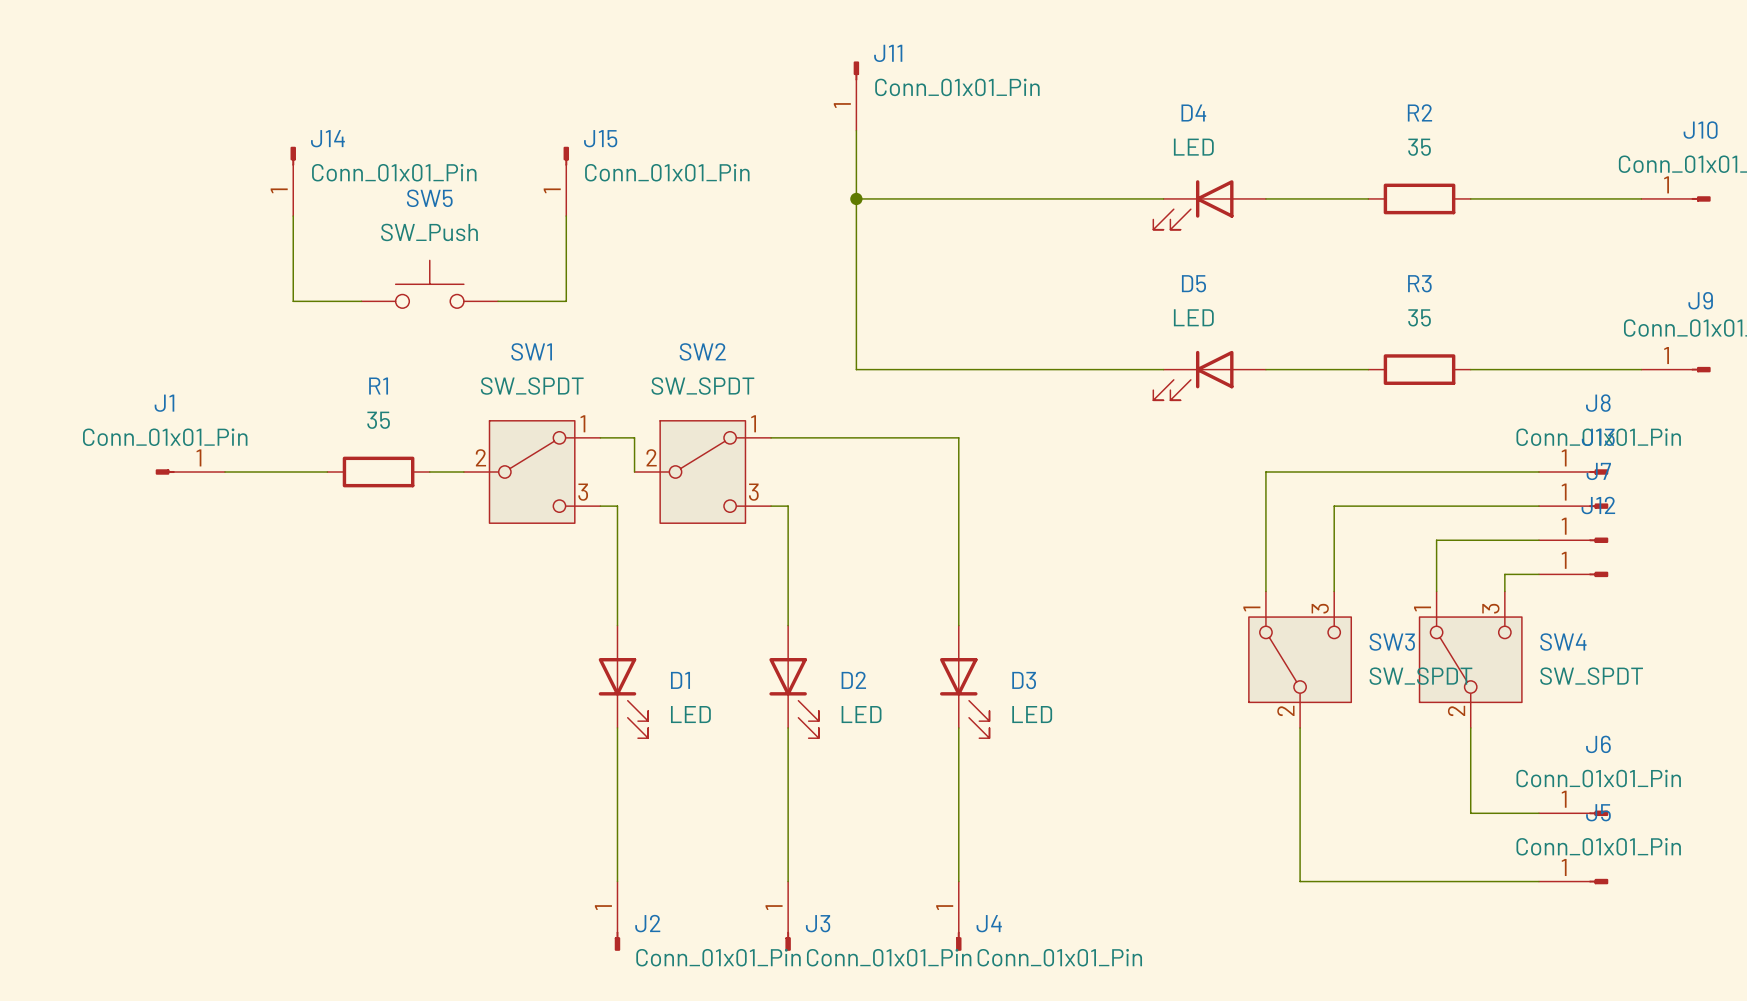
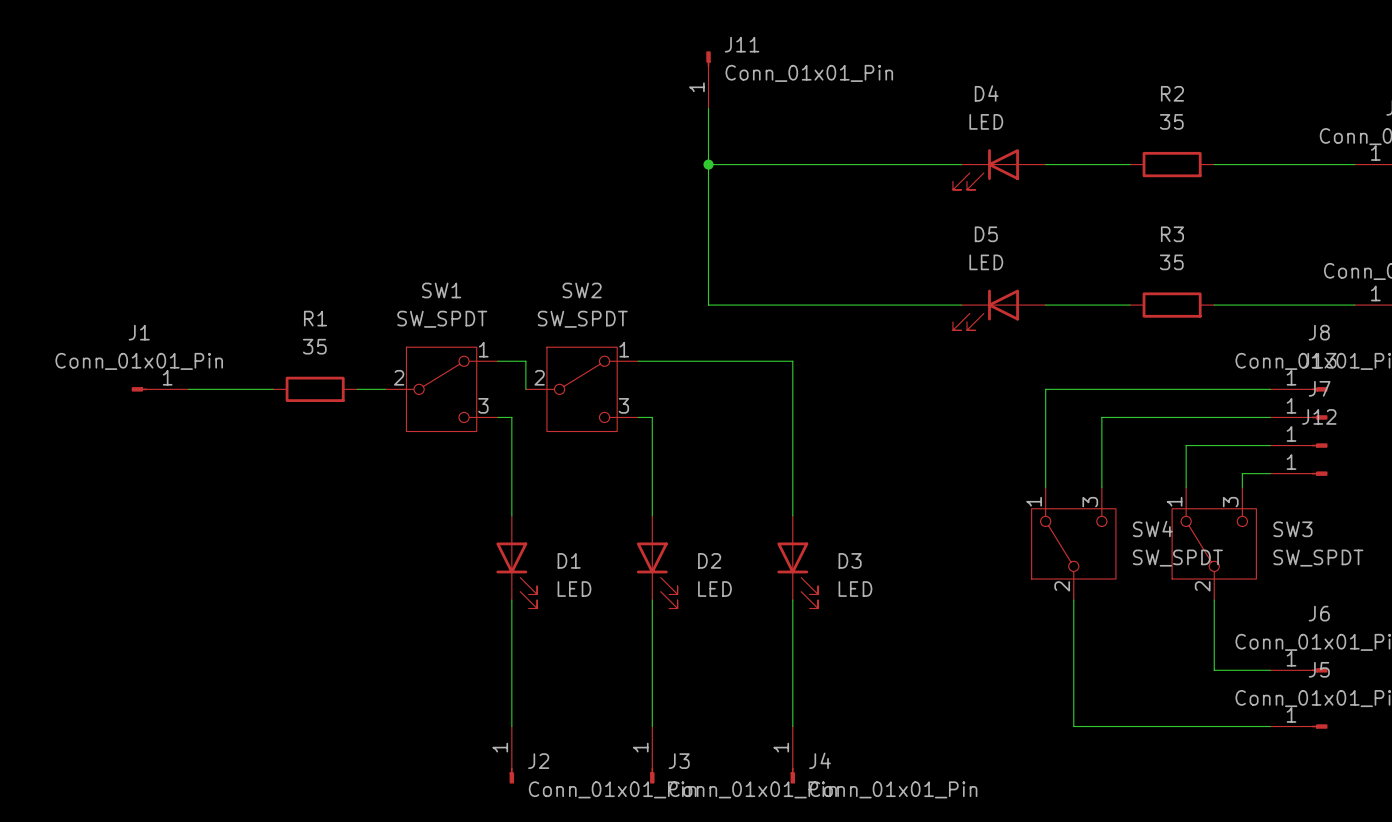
J14: Conn_01x01_Pin (293, 181) -> none
J15: Conn_01x01_Pin (566, 181) -> none
wire: (293, 216) (293, 301) (361, 301) -> none
wire: (566, 216) (566, 301) (498, 301) -> none
SW5: SW_Push (429, 284) -> none
SW3 name: SW3 (1392, 642) -> SW4 (1152, 528)
SW4 name: SW4 (1563, 642) -> SW3 (1292, 529)

